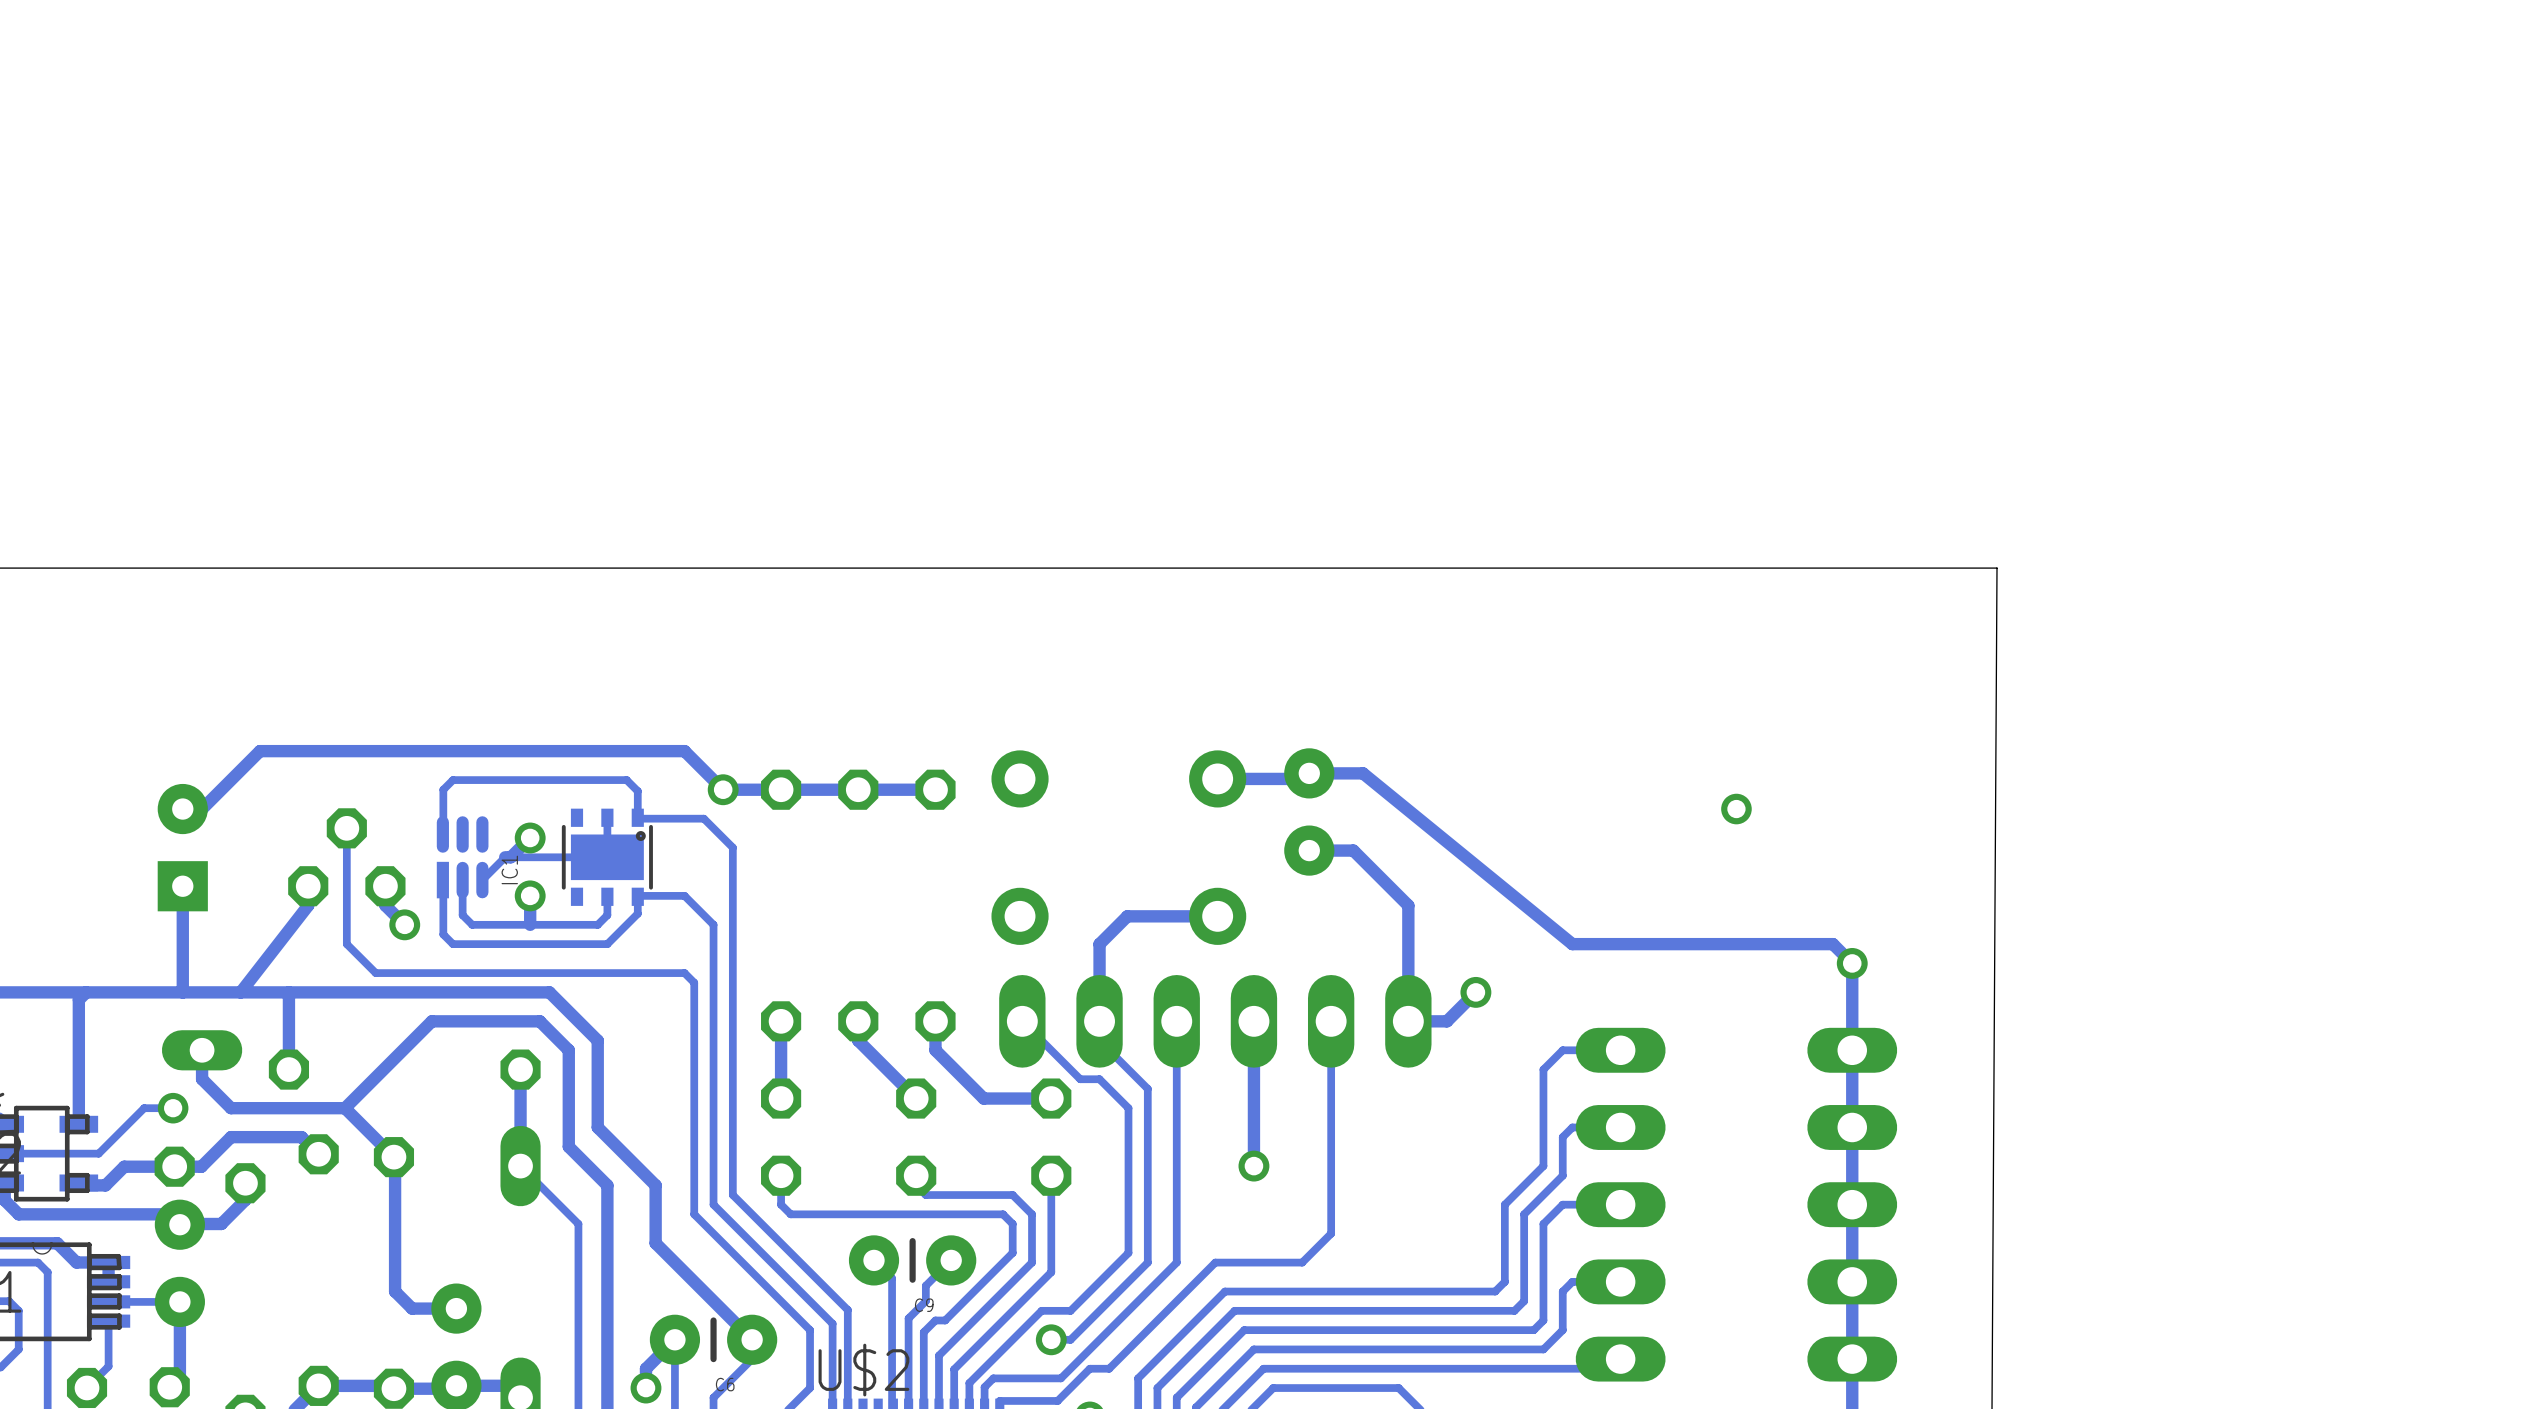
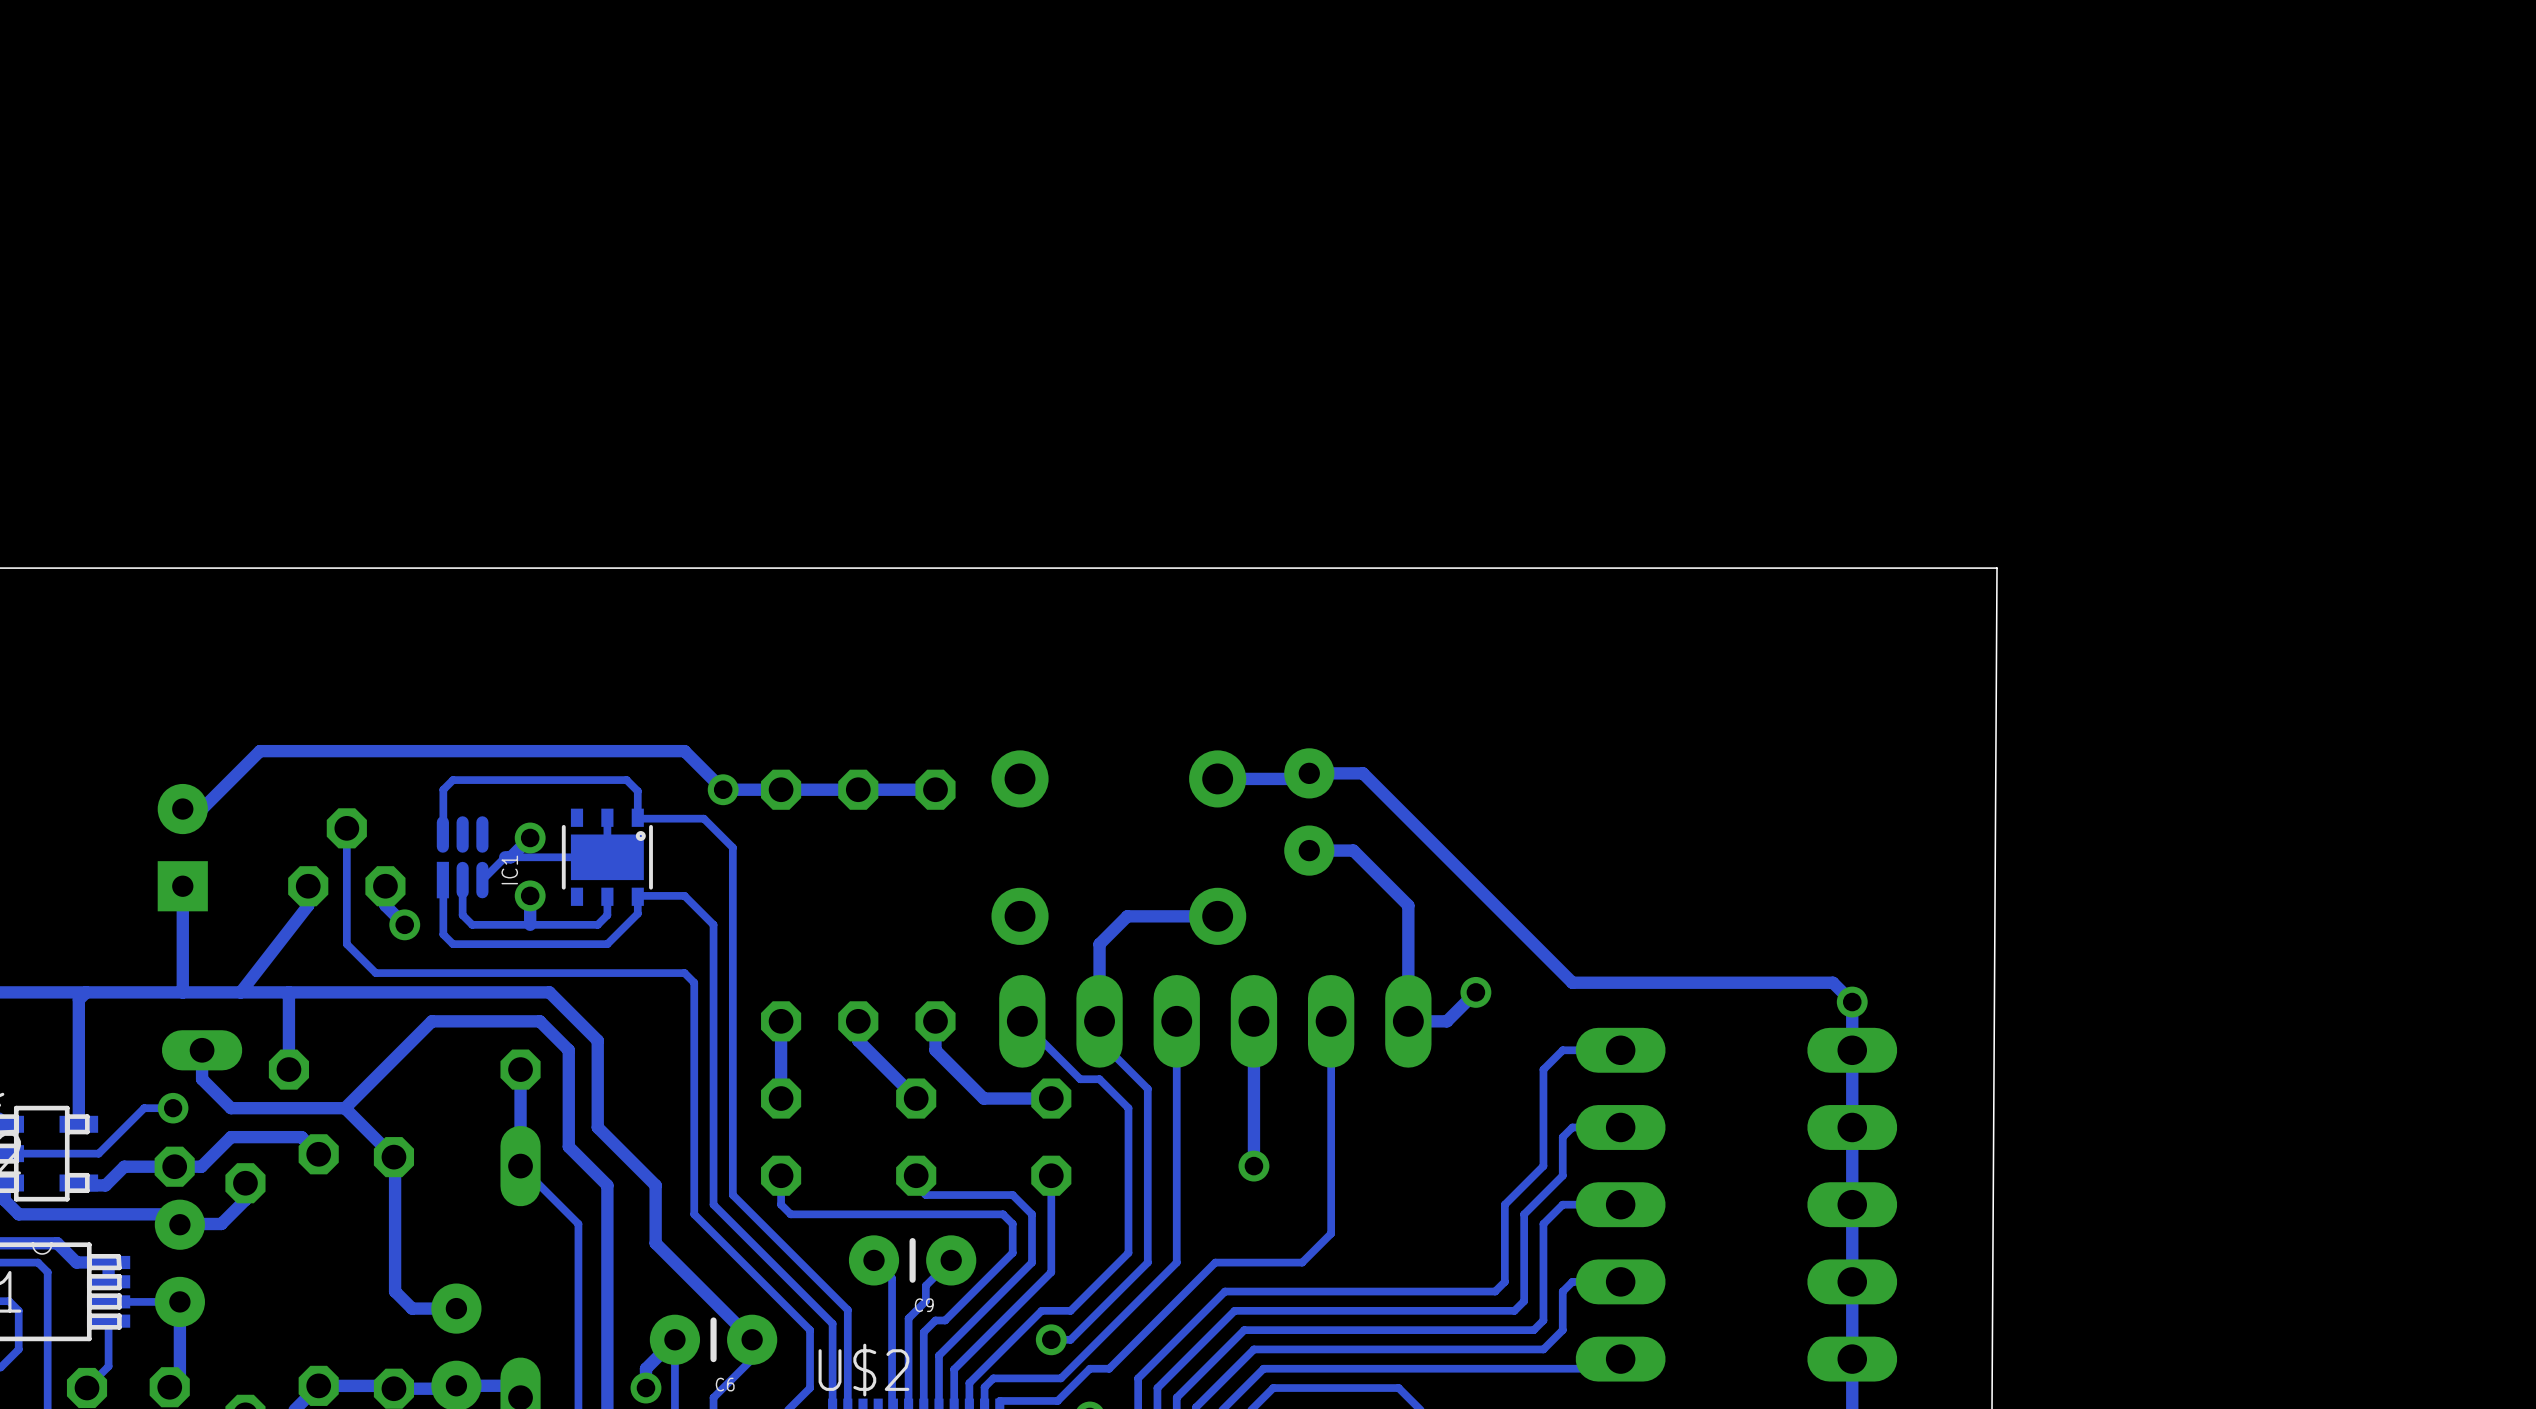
track: (1363, 773) (1572, 944) (1832, 944) (1852, 963) (1852, 1002) -> (1363, 773) (1572, 982) (1832, 982) (1852, 1002)
via: (1736, 809) -> none
via position: (1852, 963) -> (1852, 1002)

